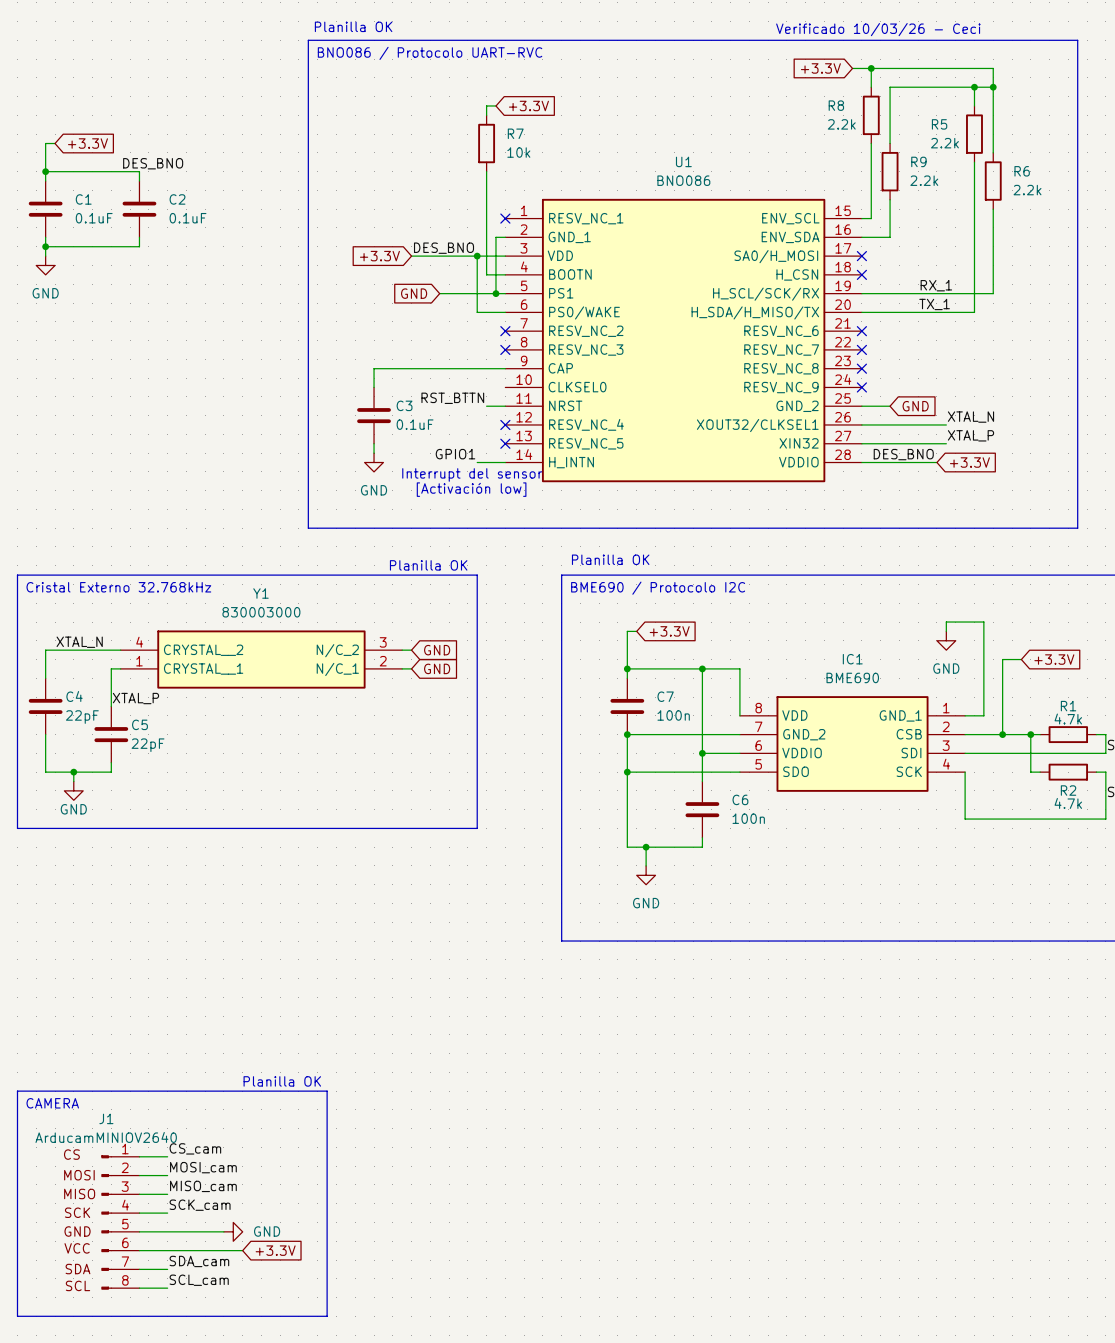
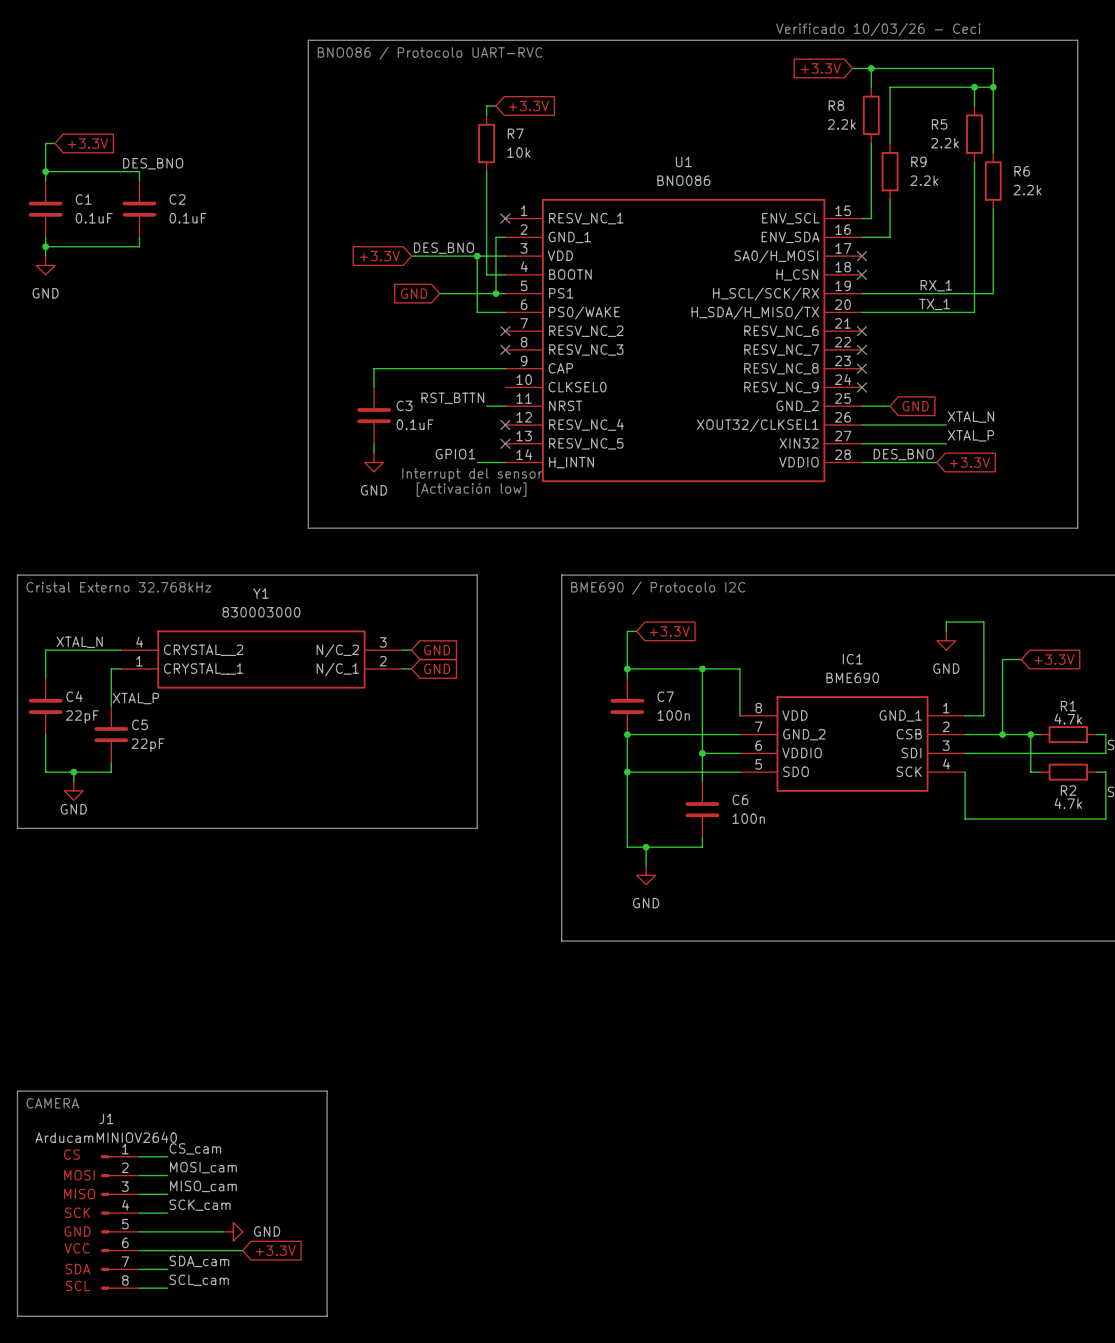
text: Planilla OK (353, 26) -> none
text: Planilla OK (610, 559) -> none
text: Planilla OK (428, 565) -> none
text: Planilla OK (282, 1081) -> none

